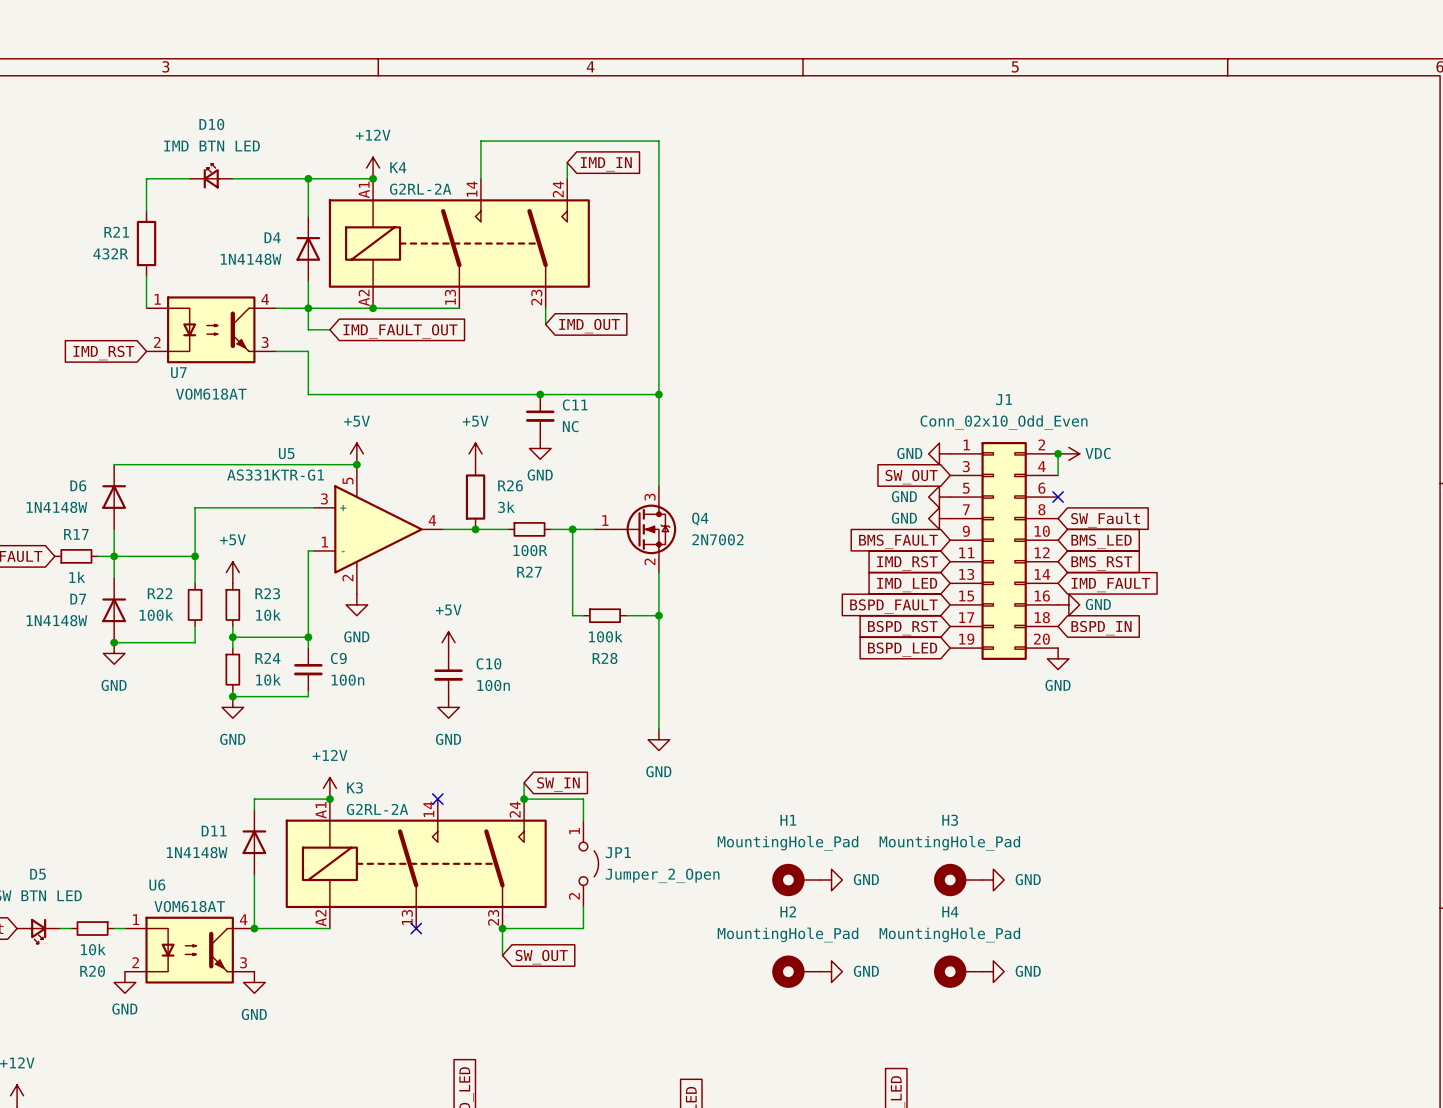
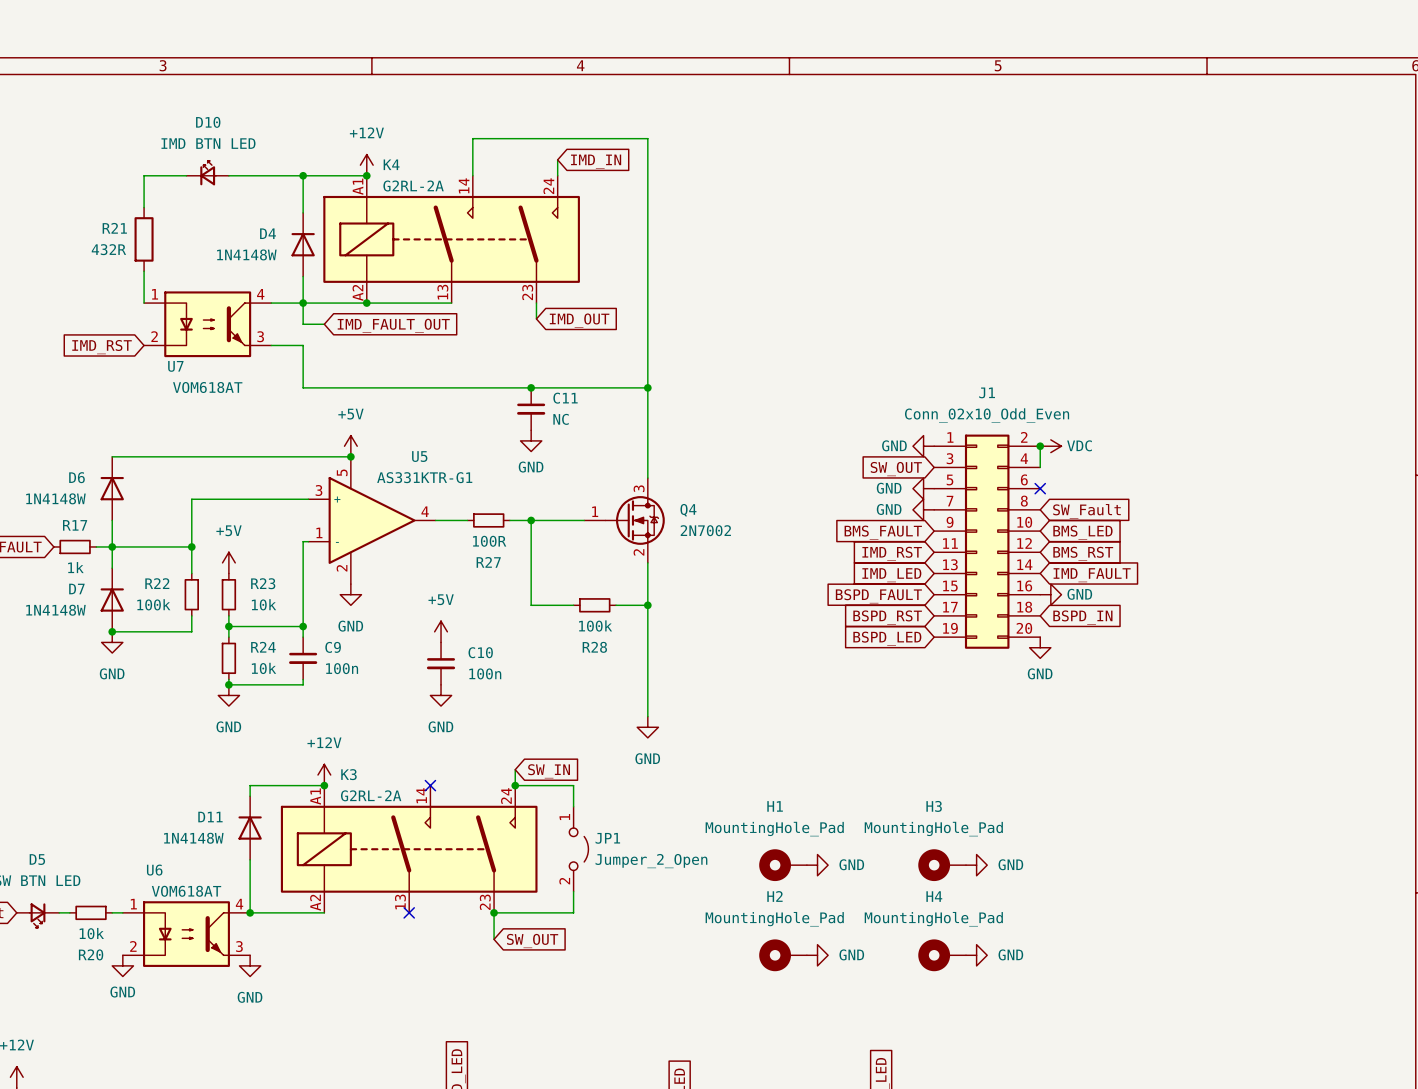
U5 name position: U5 (286, 453) -> U5 (419, 456)
power symbol: +5V (475, 453) -> none
U5 value position: AS331KTR-G1 (275, 475) -> AS331KTR-G1 (424, 477)
R26: 3k (475, 497) -> none
wire: (475, 529) (507, 529) -> (509, 520) (541, 520)
junction: (475, 529) -> none
R27 position: (529, 529) -> (488, 520)
junction: none -> (531, 520)
wire: (572, 529) (572, 615) -> (531, 520) (531, 605) (562, 605)
junction: (572, 529) -> none

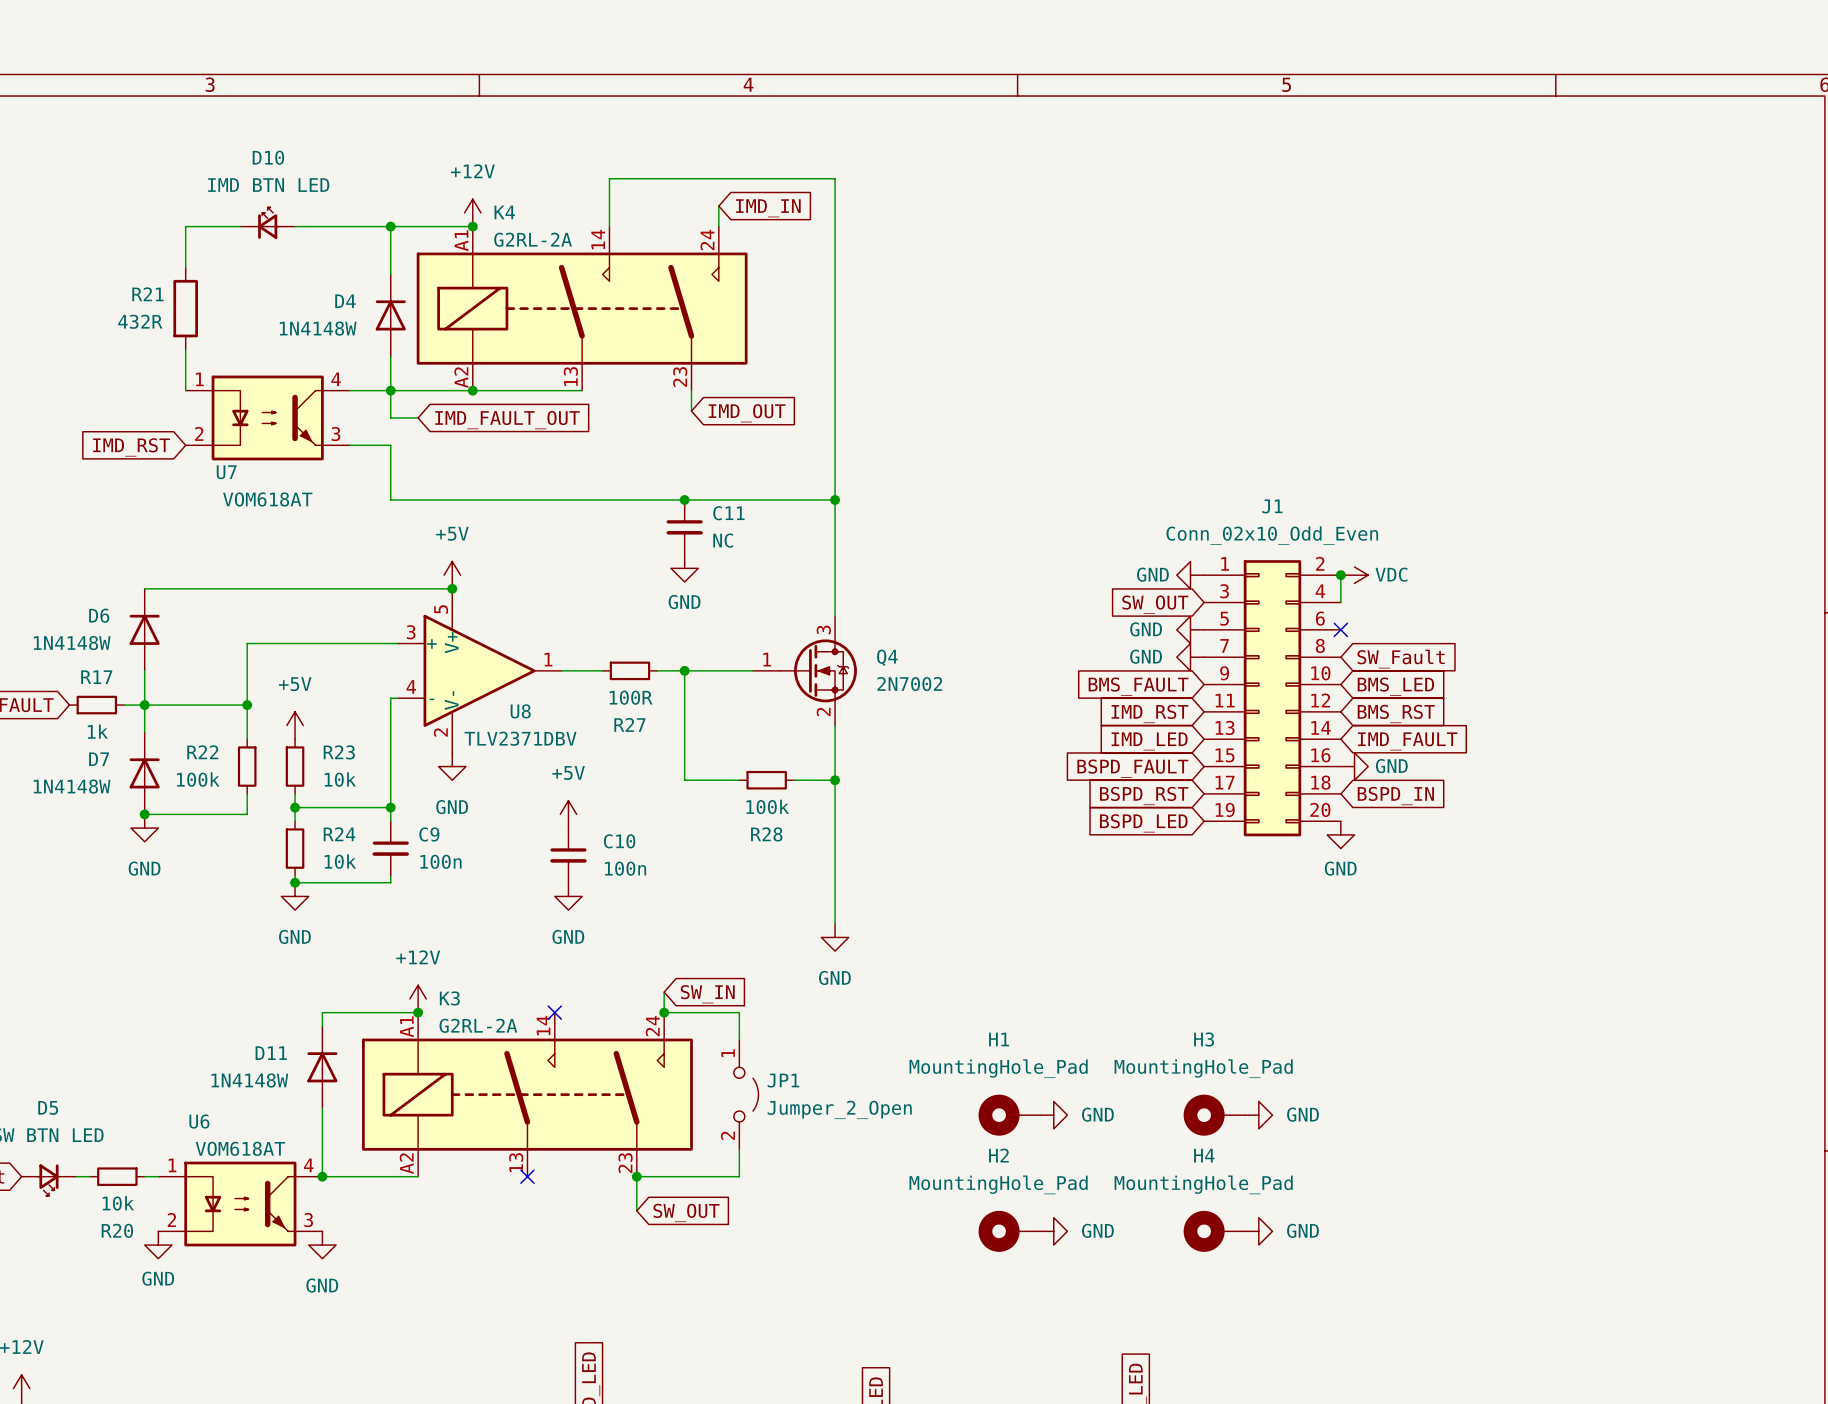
U5 symbol: [308, 456, 436, 585] -> [397, 588, 562, 753]
U5 name: U5 (419, 456) -> U8 (520, 711)
U5 value: AS331KTR-G1 (424, 477) -> TLV2371DBV (520, 738)

